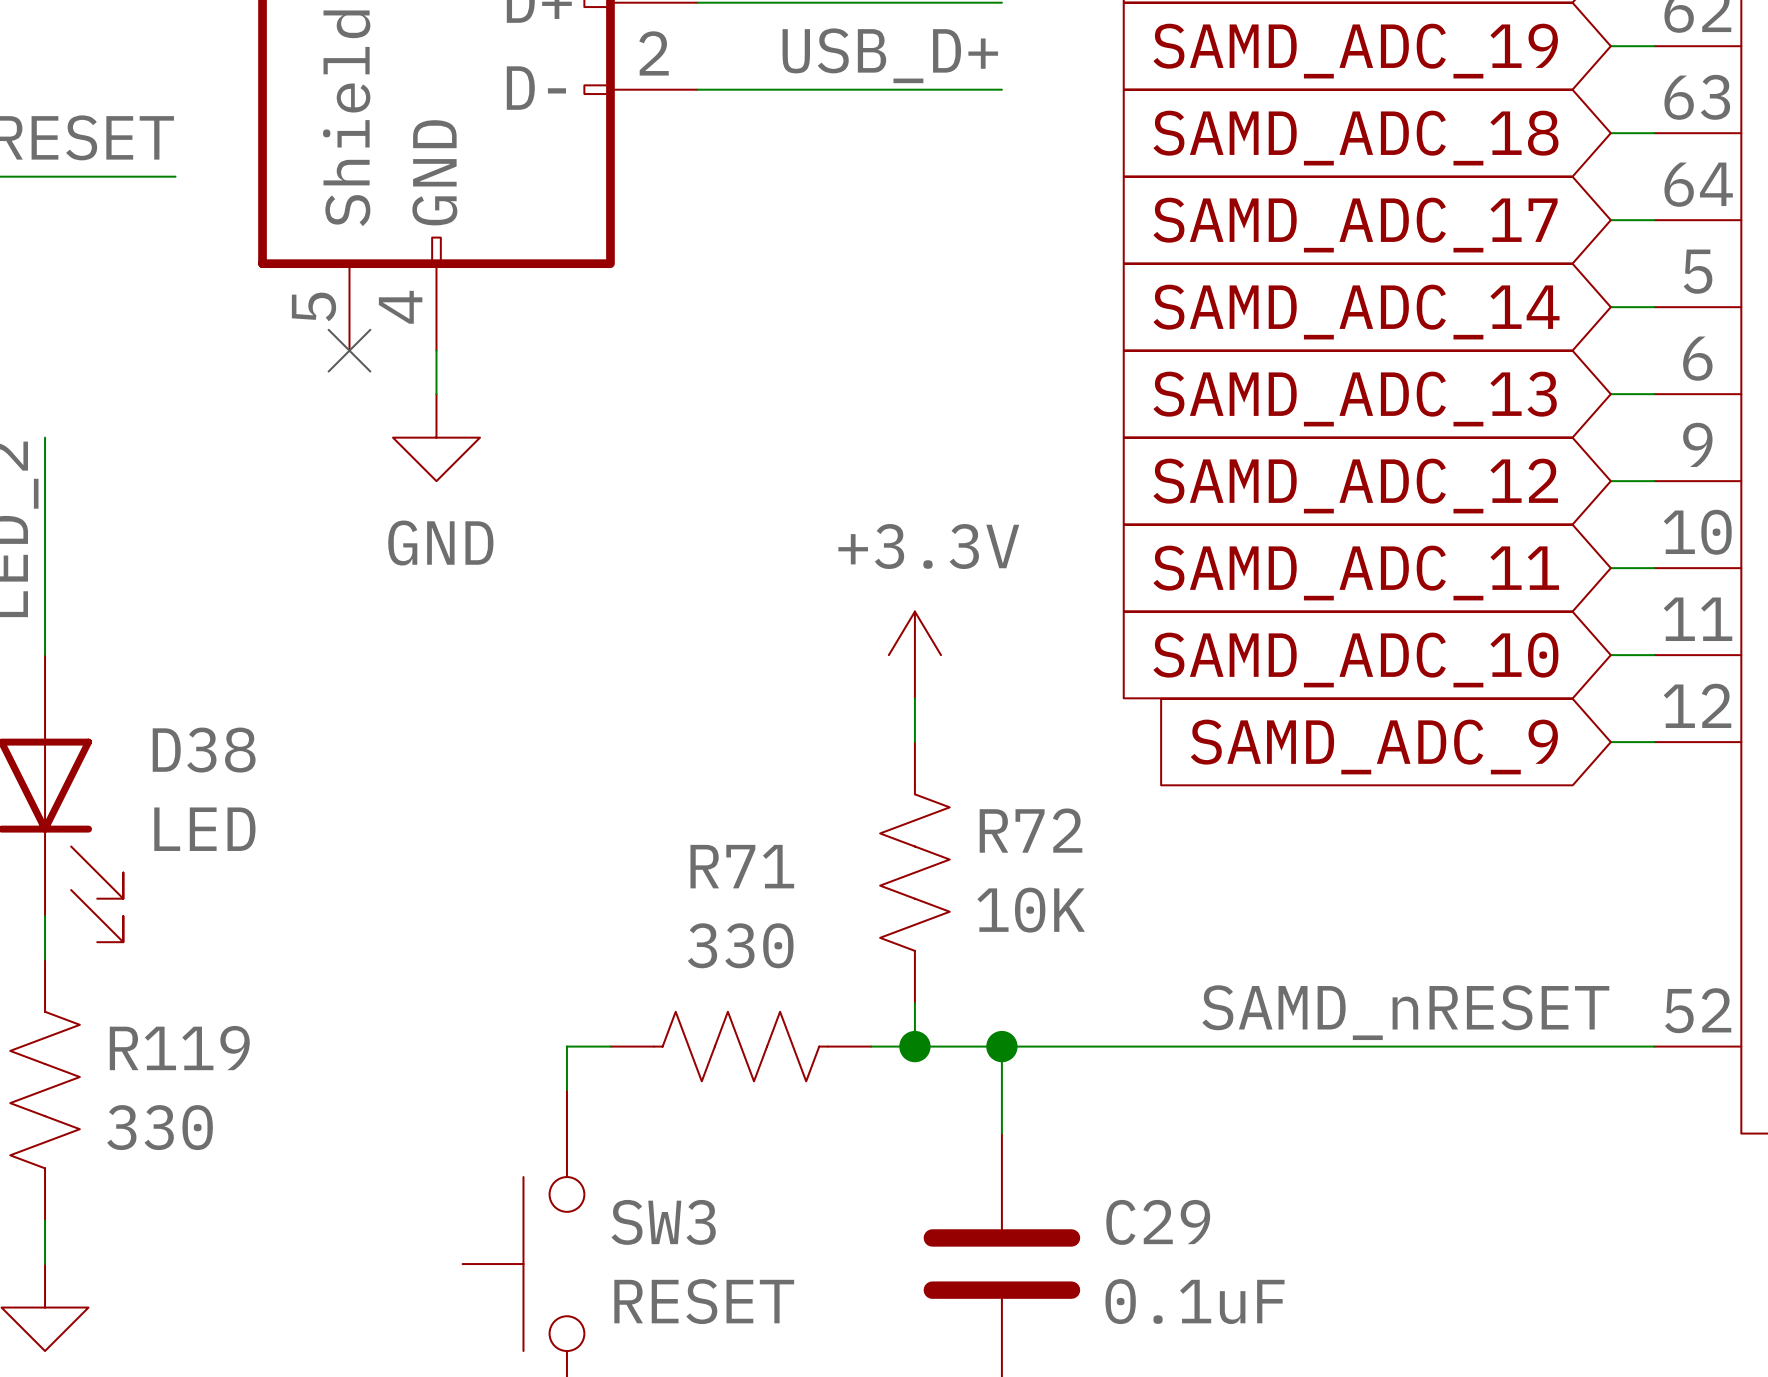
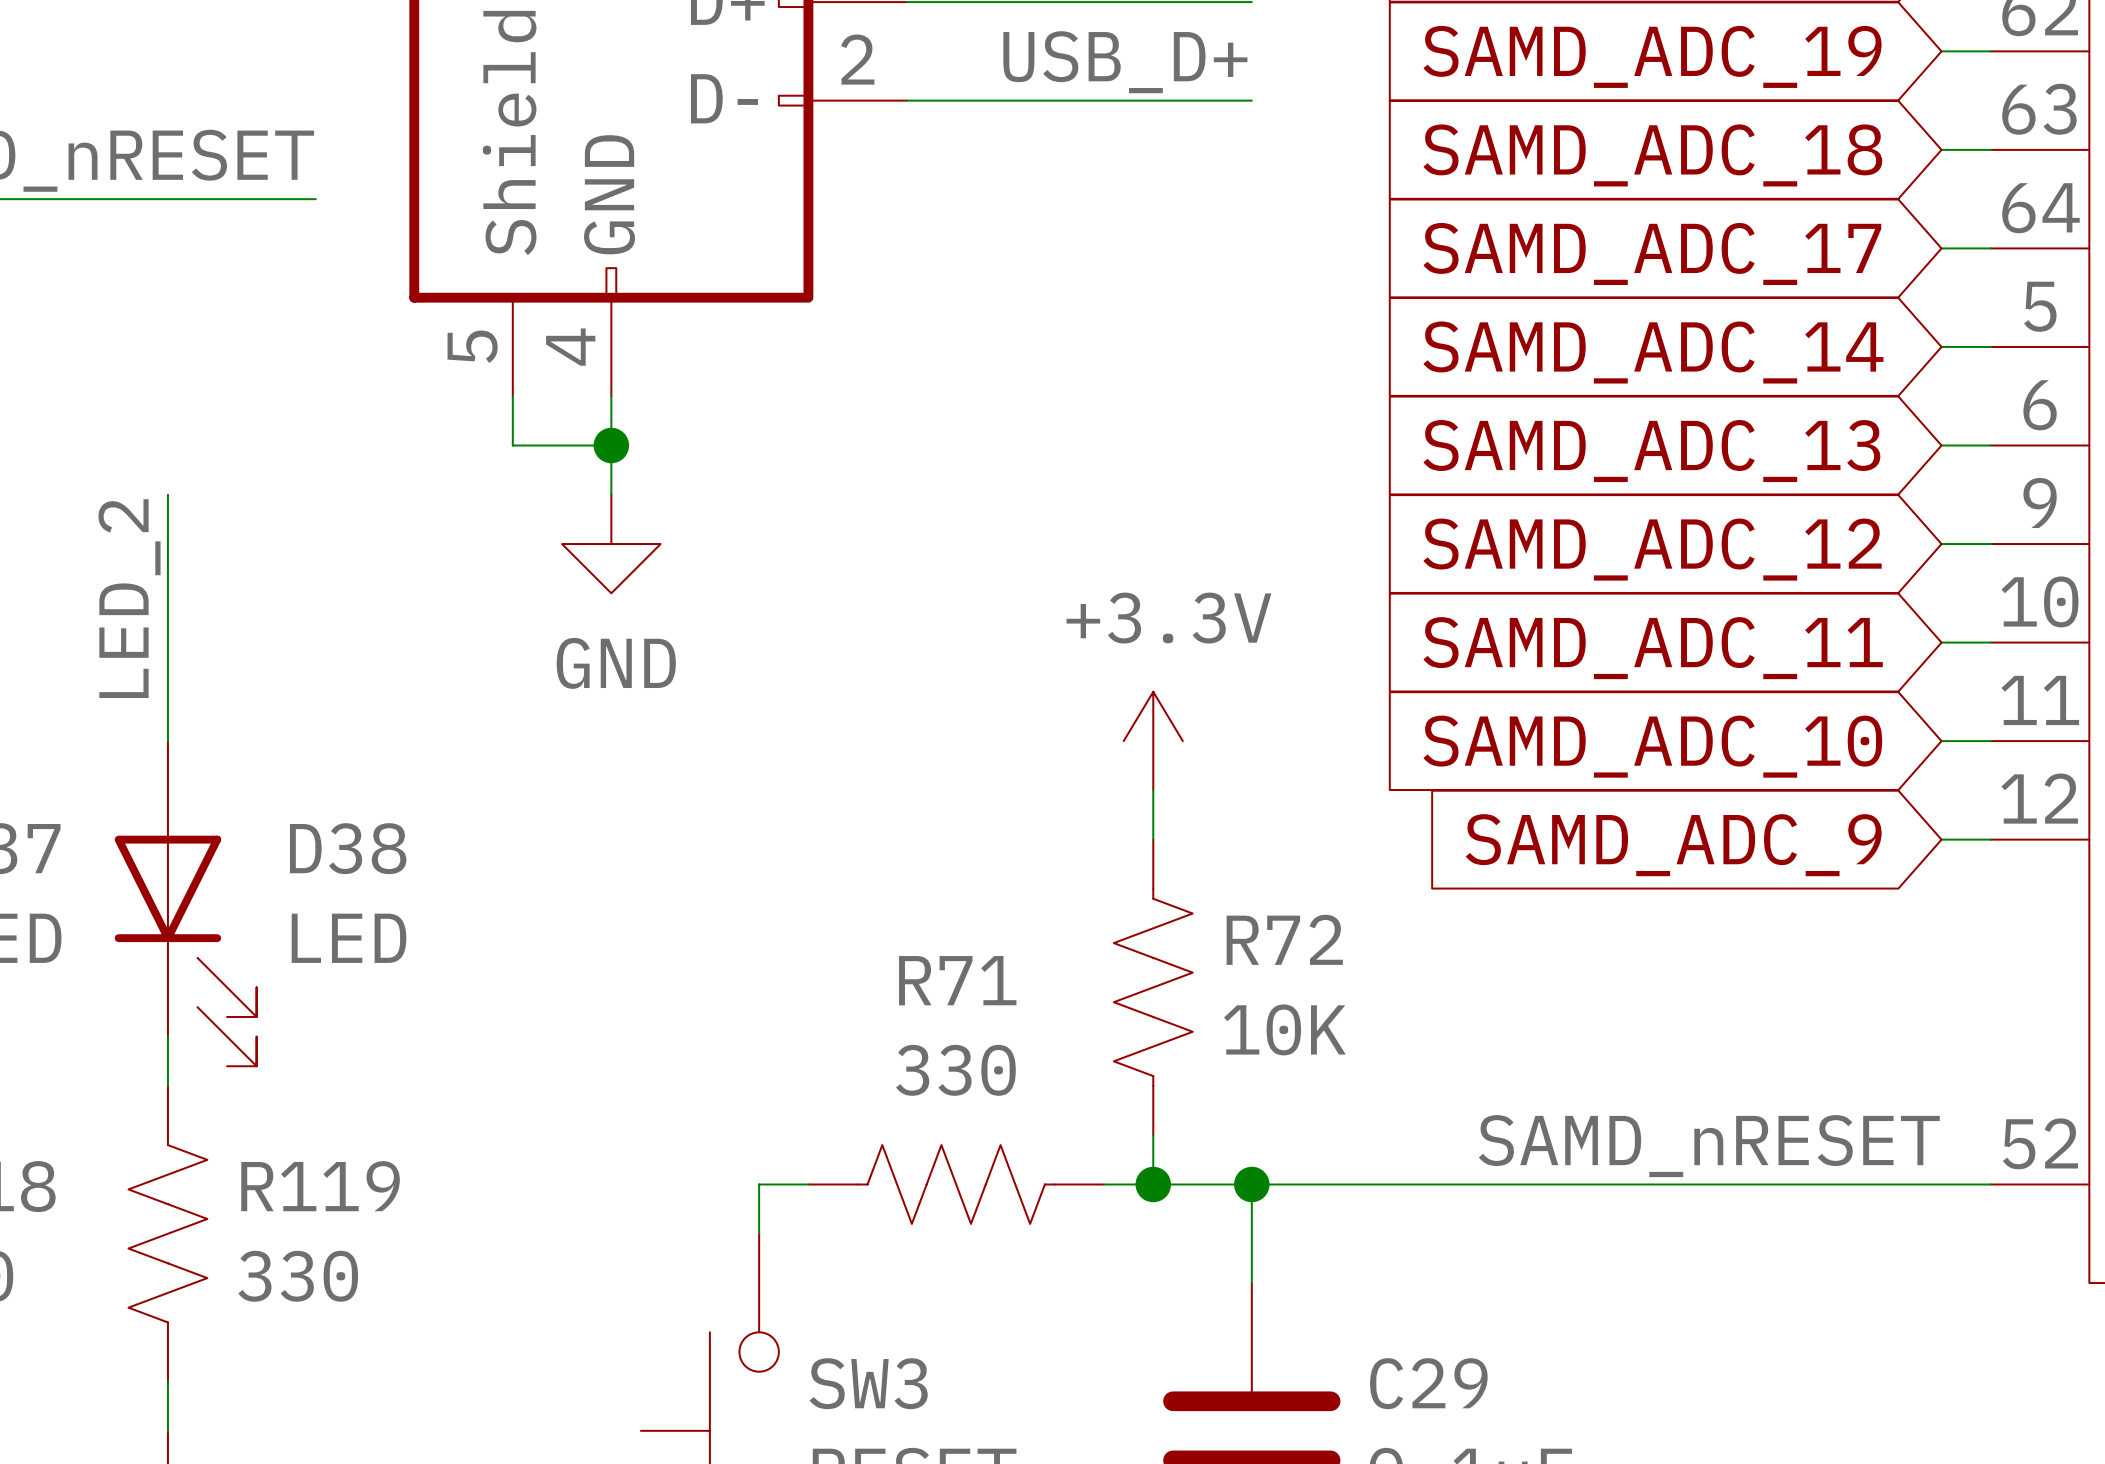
wire: none -> (512, 396) (512, 445) (611, 445) (611, 494)
no-connect mark: (349, 350) -> none
junction: none -> (611, 445)
power symbol position: GND (436, 437) -> GND (611, 544)

